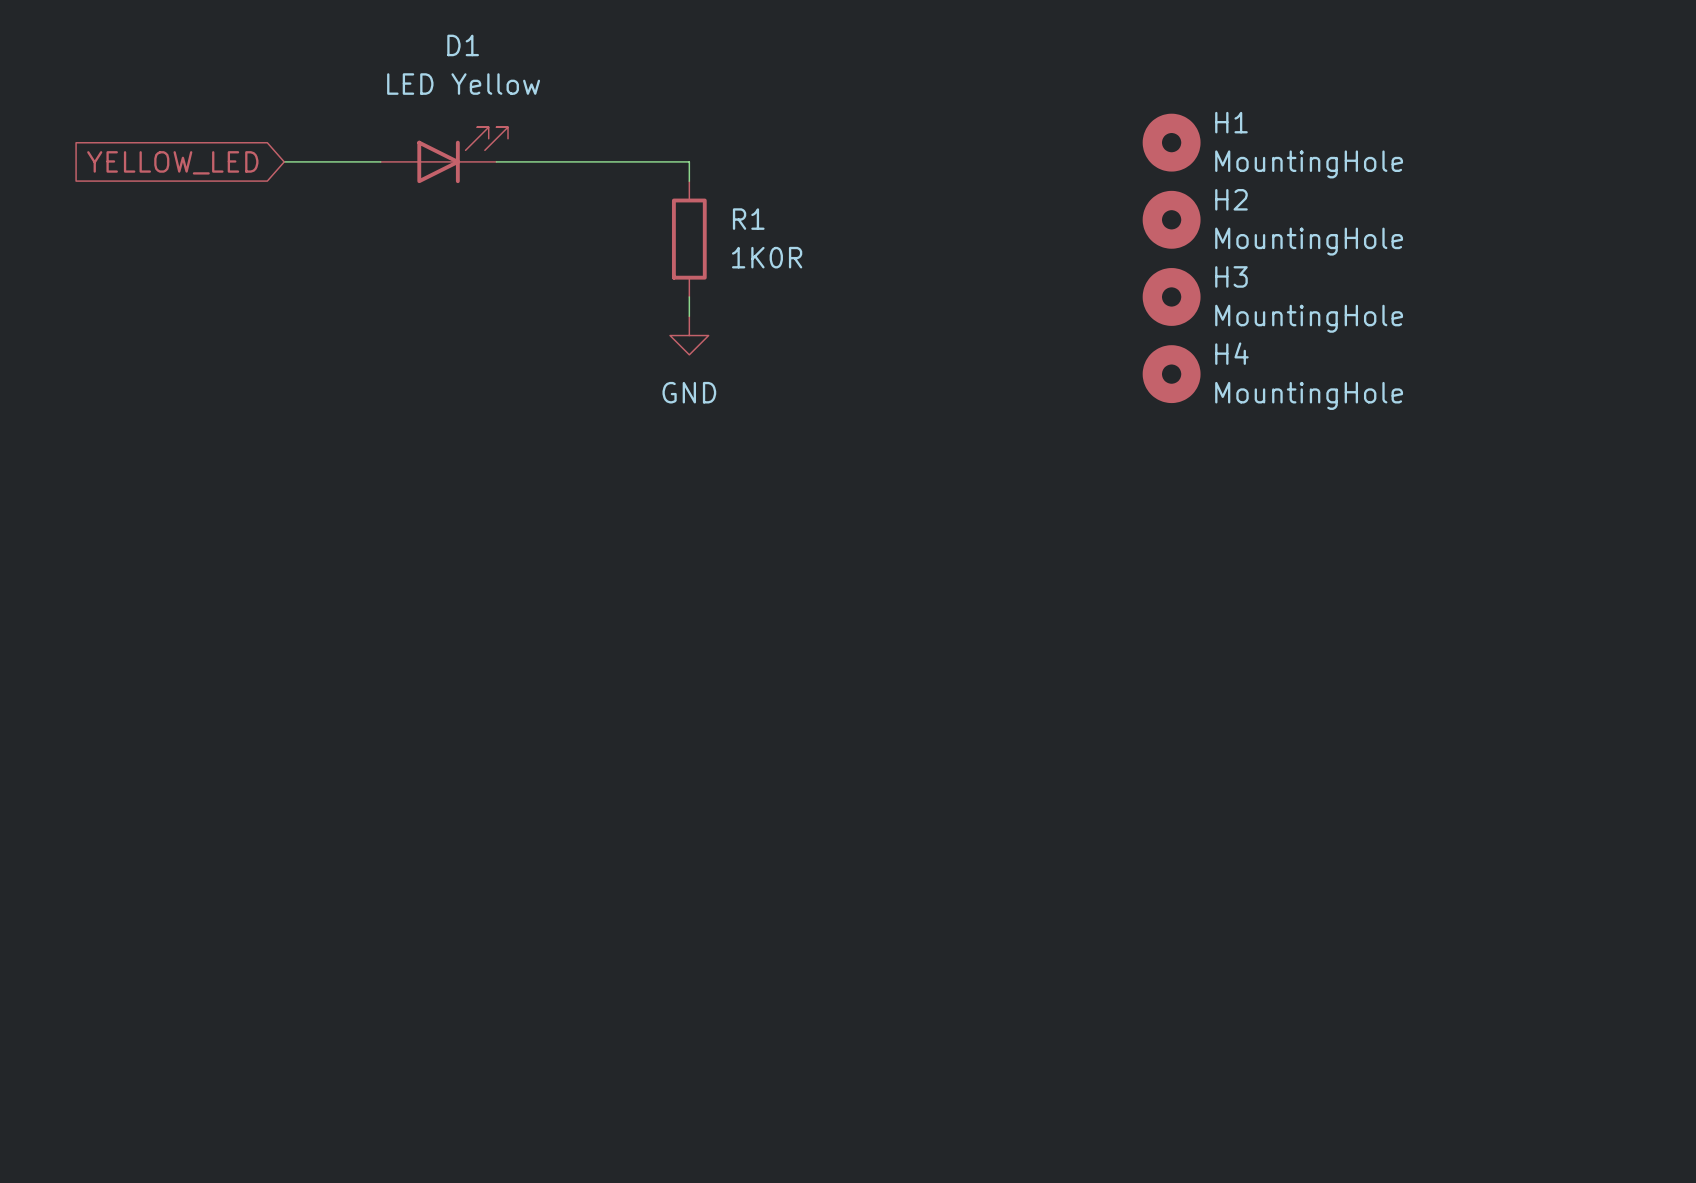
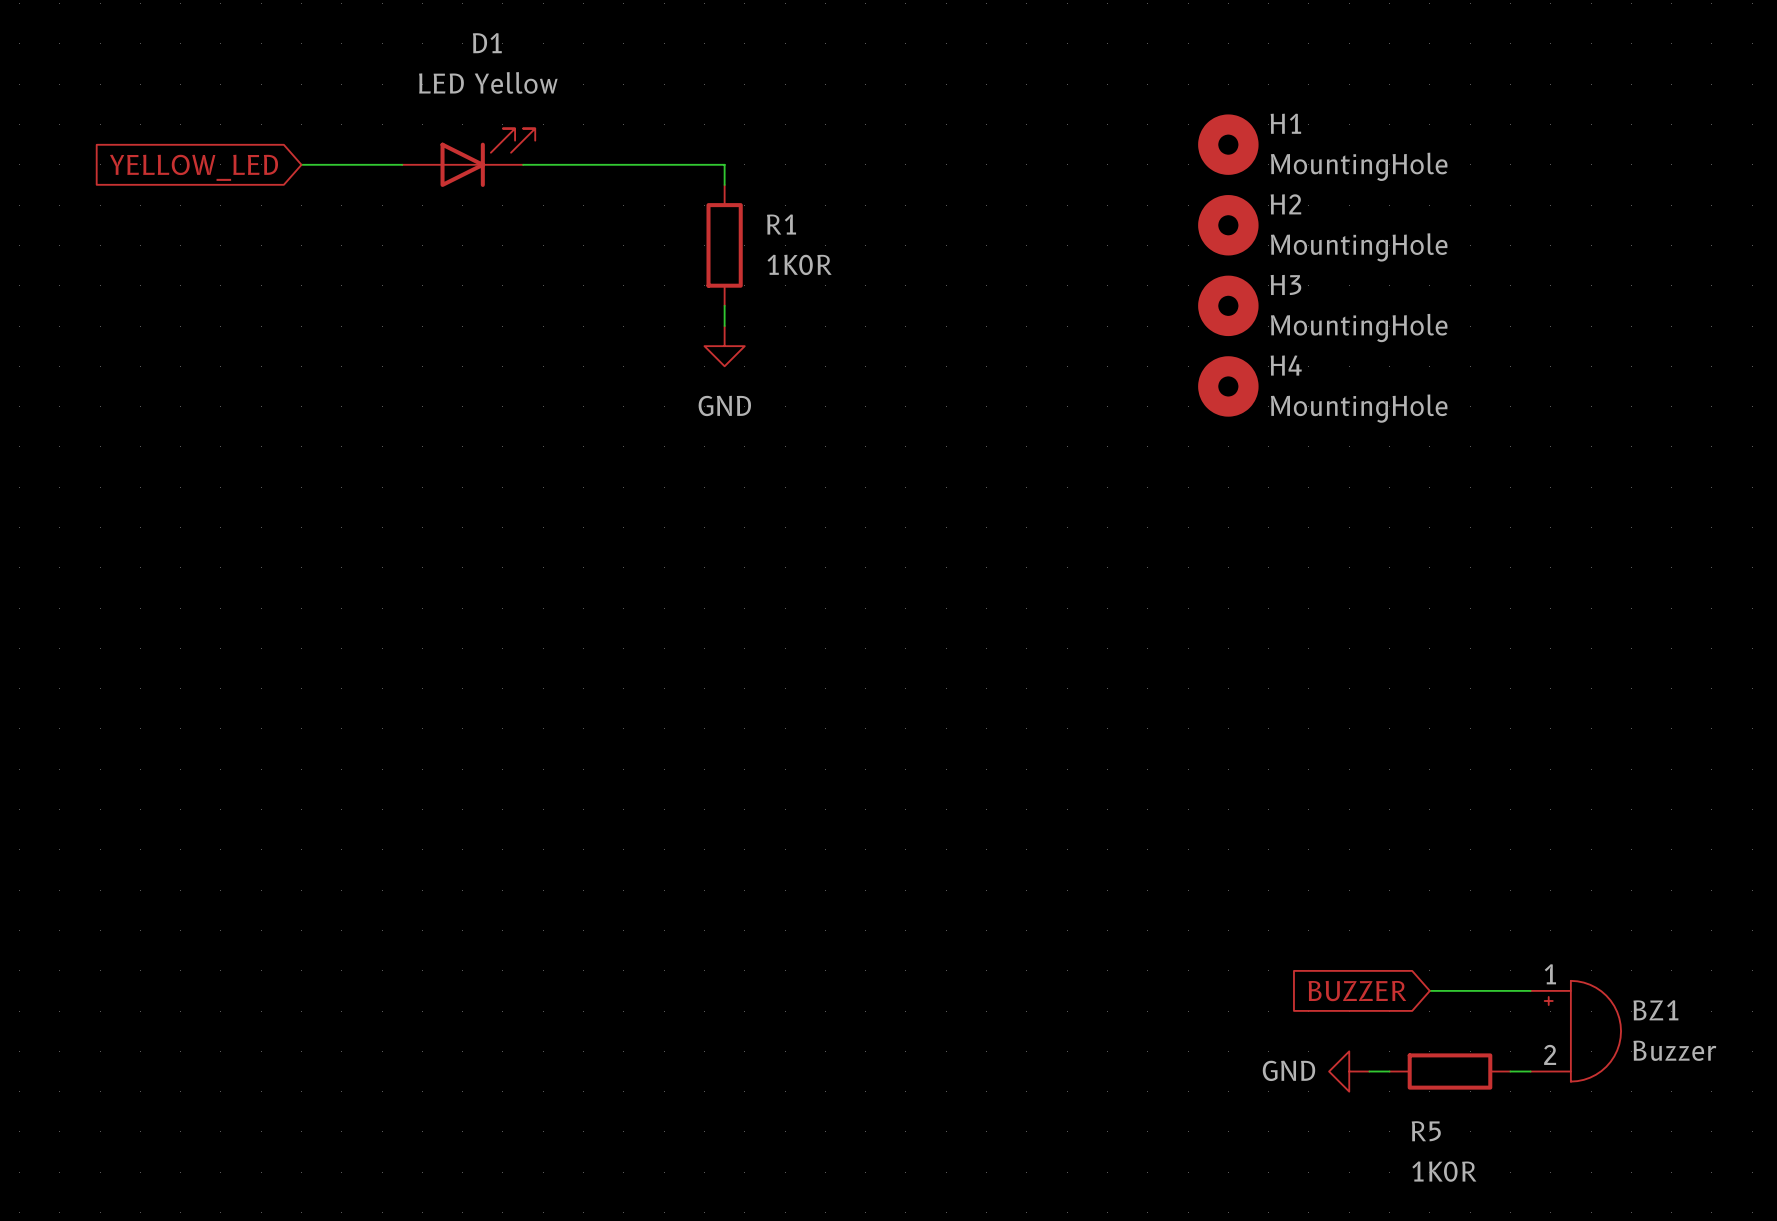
global label: none -> BUZZER (1357, 991)
wire: none -> (1429, 990) (1530, 990)
BZ1: none -> Buzzer (1575, 1031)
power symbol: none -> GND (1349, 1071)
wire: none -> (1369, 1071) (1389, 1071)
R5: none -> 1K0R (1449, 1071)
wire: none -> (1510, 1071) (1530, 1071)

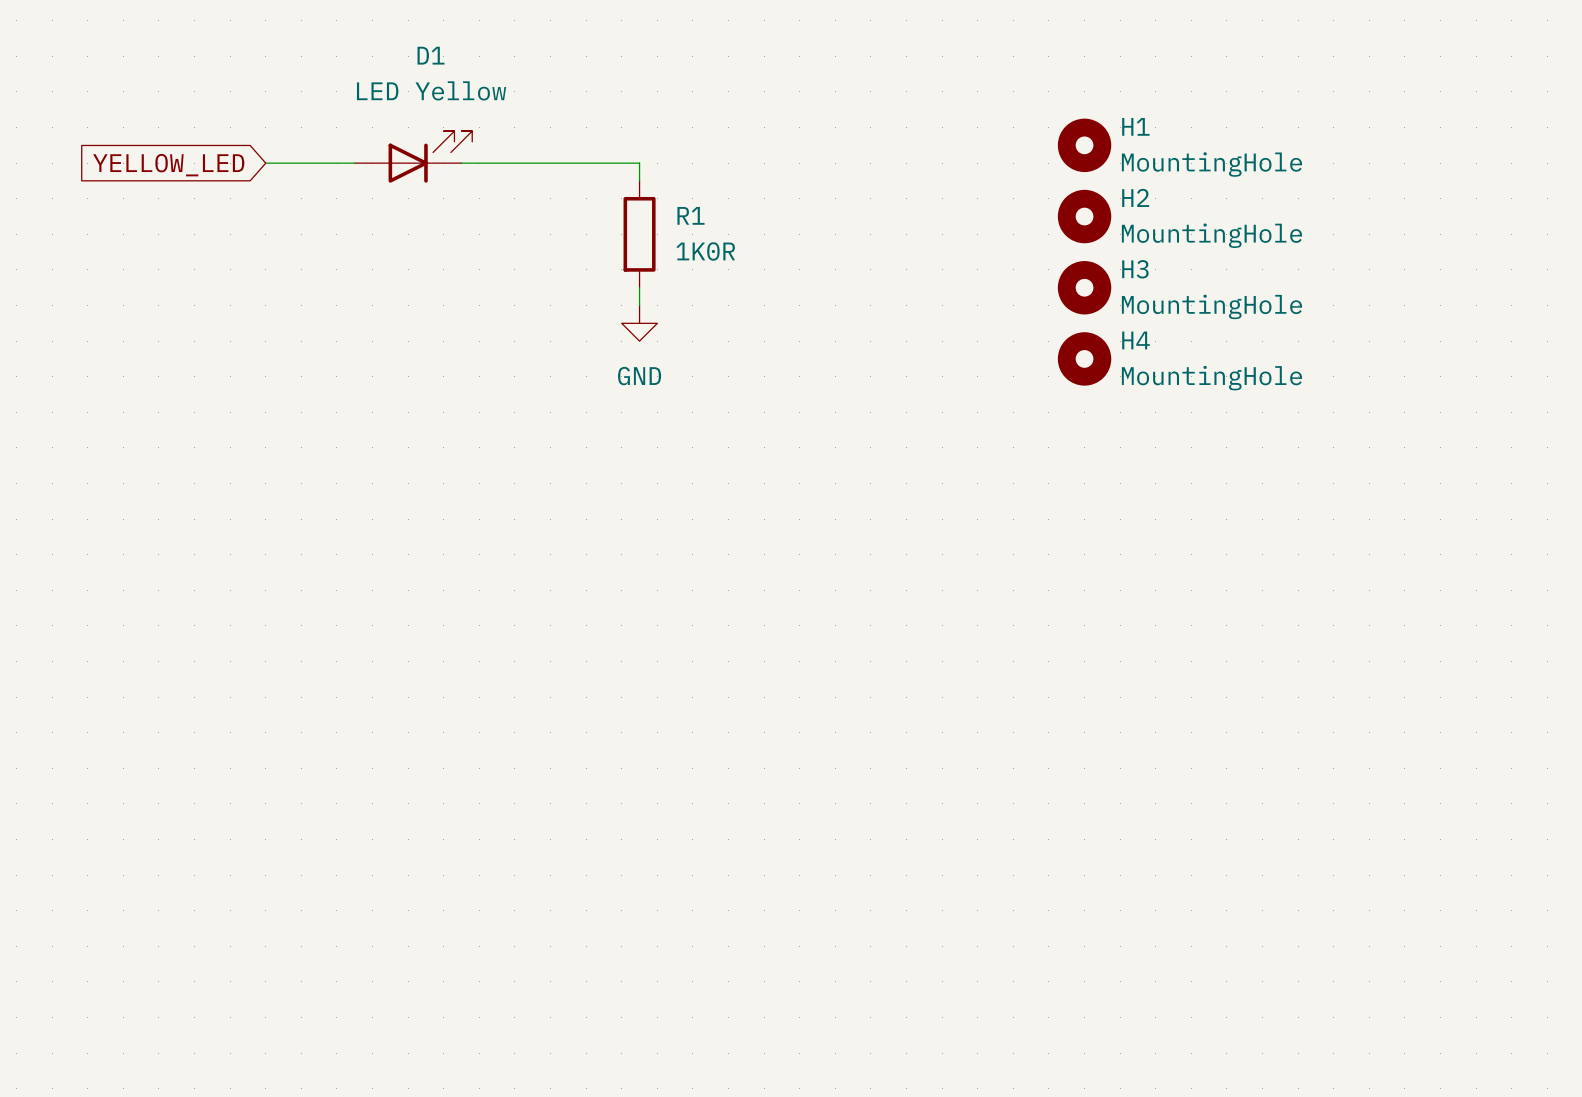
wire: (1429, 990) (1530, 990) -> none
global label: BUZZER (1357, 991) -> none
BZ1: Buzzer (1575, 1031) -> none
power symbol: GND (1349, 1071) -> none
wire: (1369, 1071) (1389, 1071) -> none
R5: 1K0R (1449, 1071) -> none
wire: (1510, 1071) (1530, 1071) -> none

